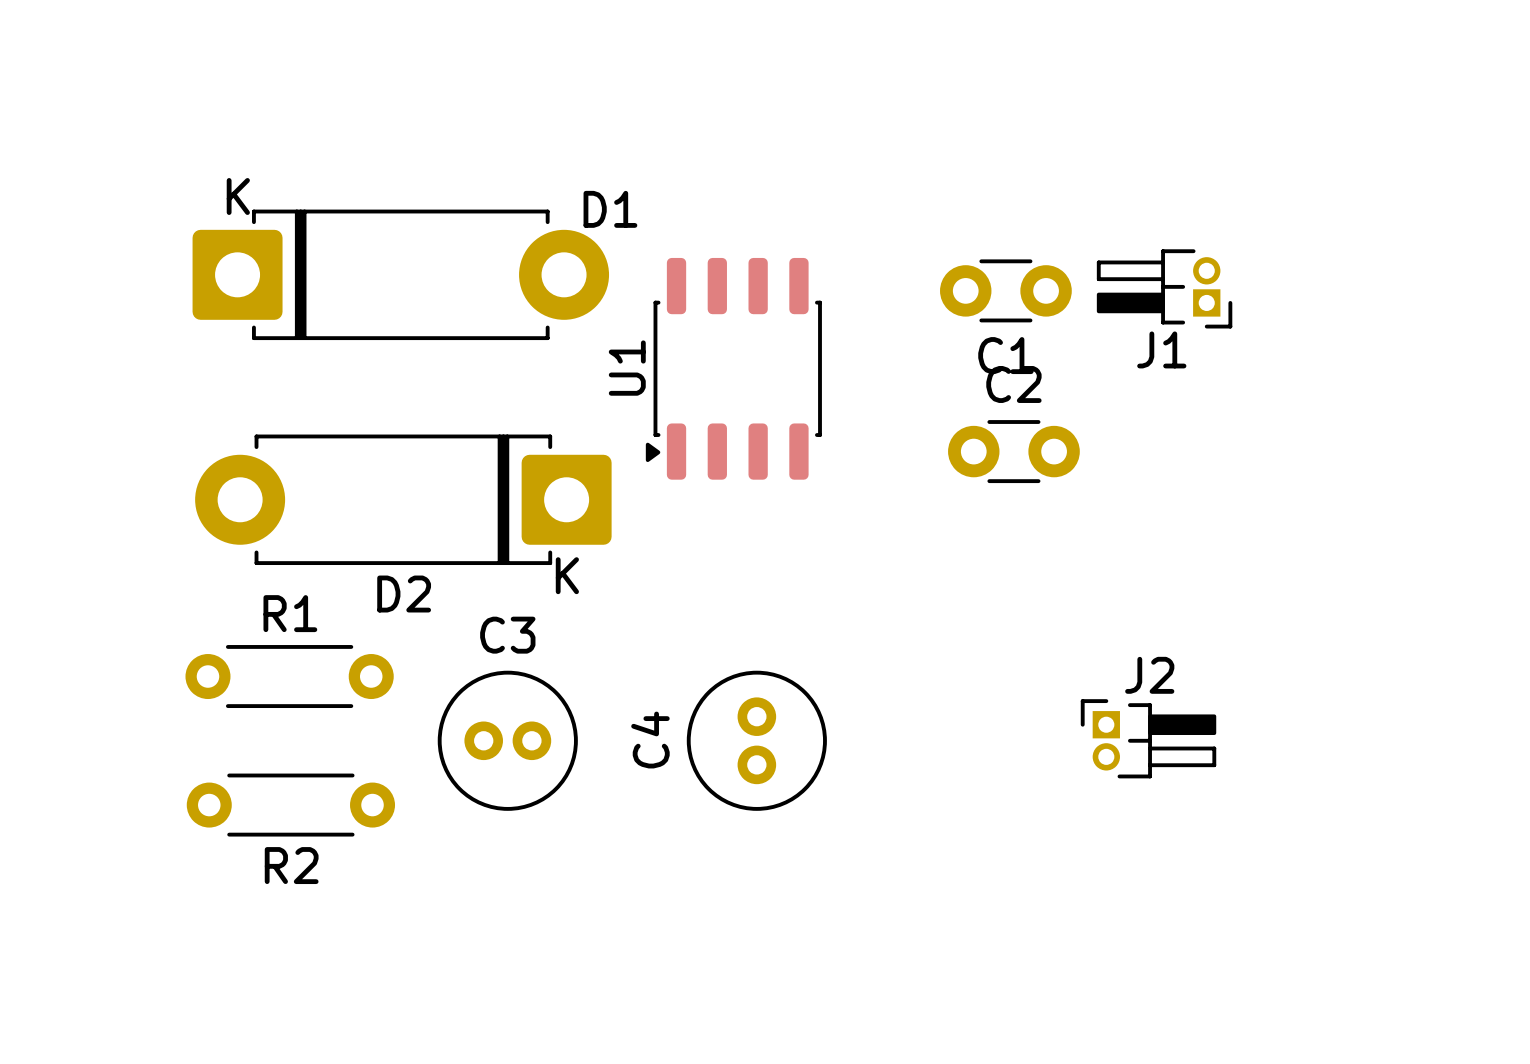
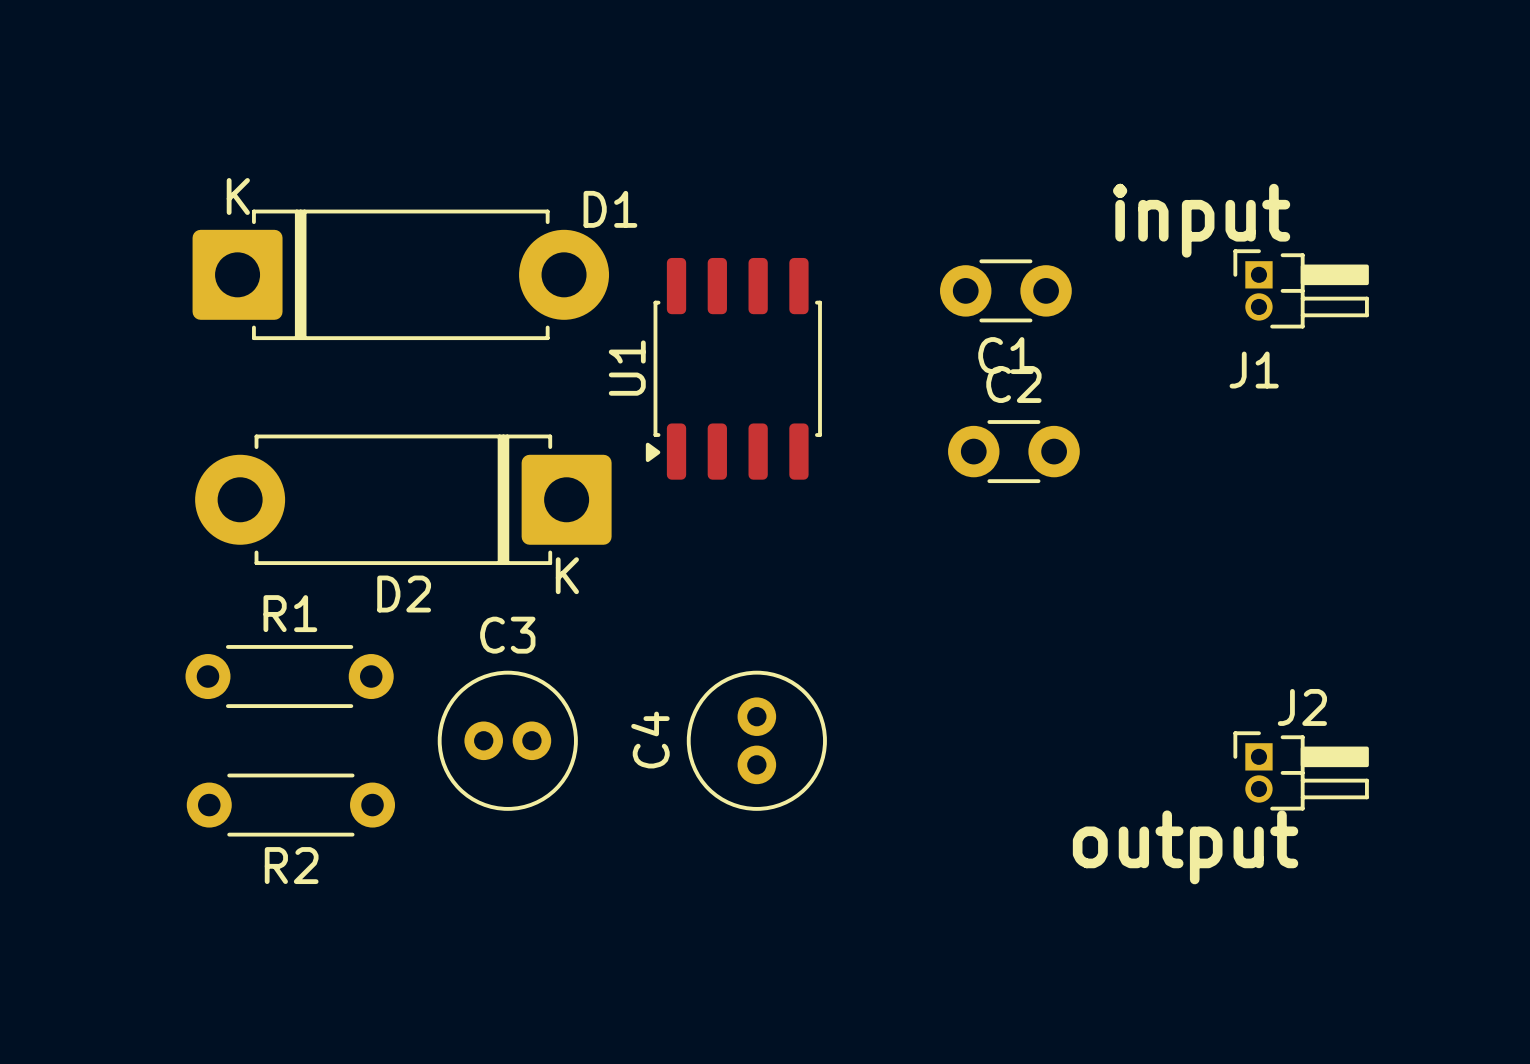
text: none -> input (1201, 220)
J1 rotation: 0° (1164, 288) -> 180° (1301, 288)
J1 position: (1164, 288) -> (1301, 288)
J2 position: (1148, 738) -> (1301, 770)
text: none -> output (1185, 847)

